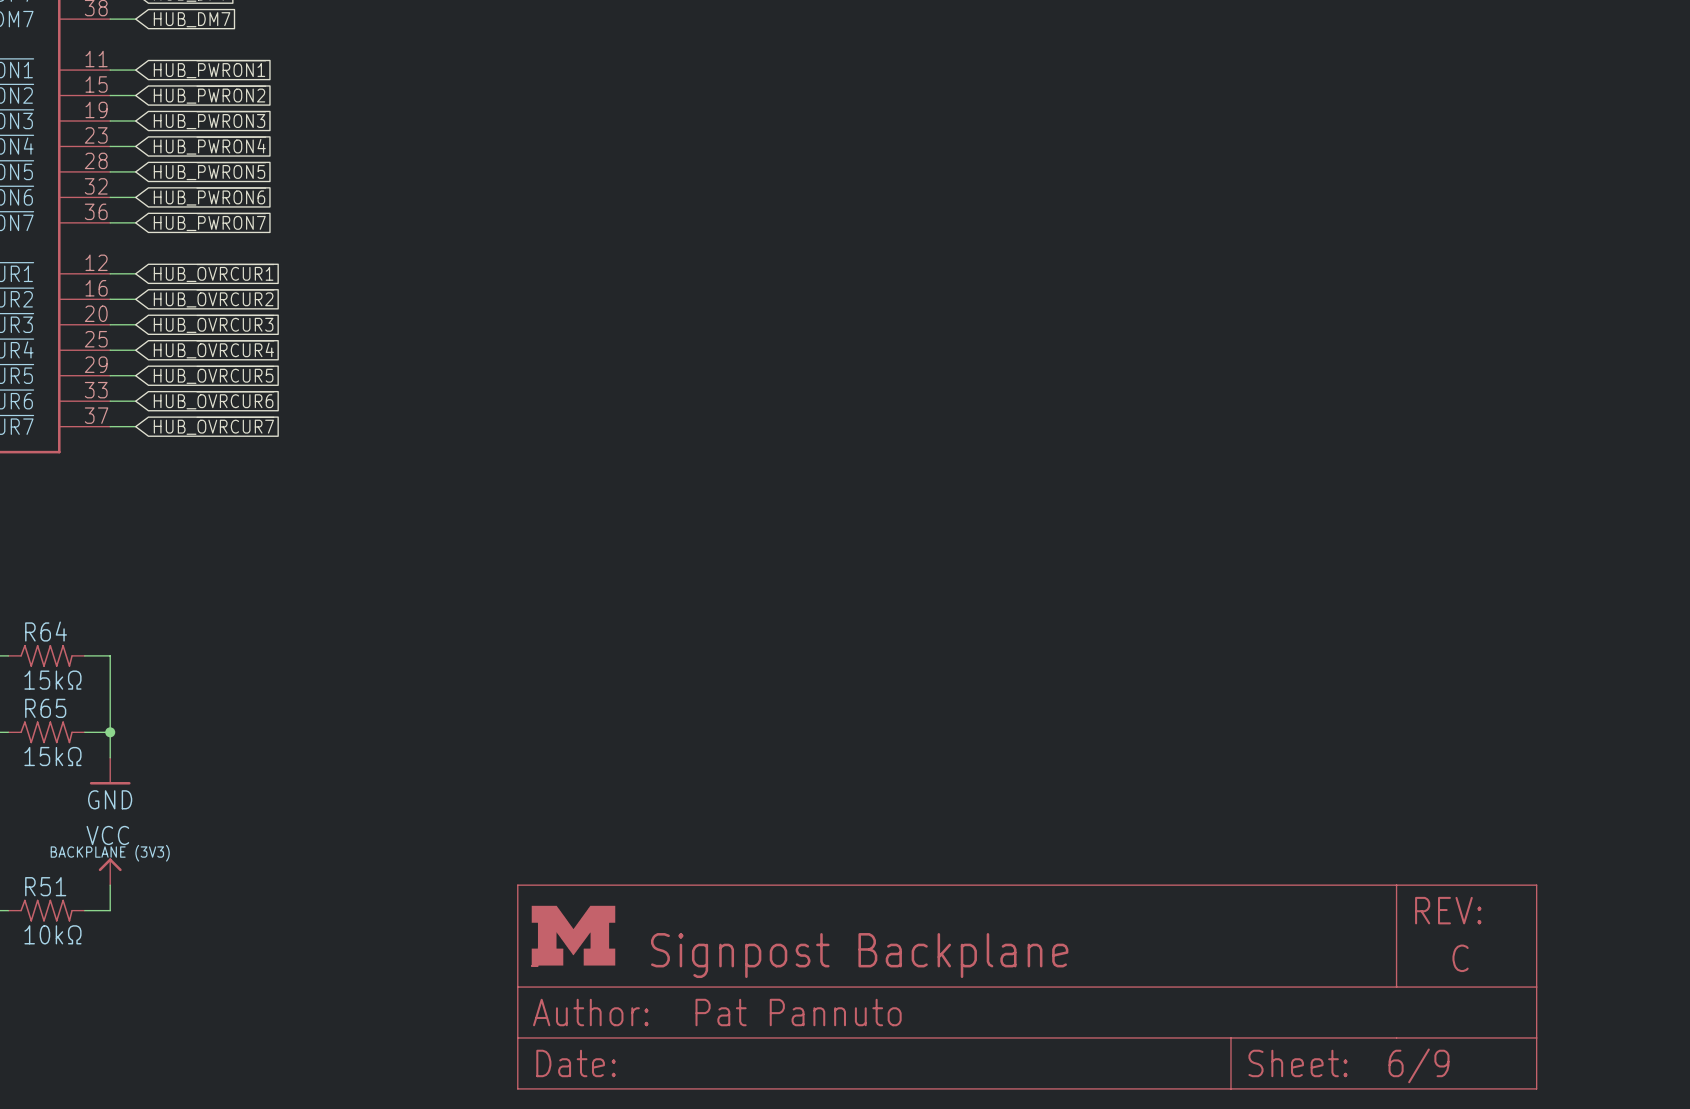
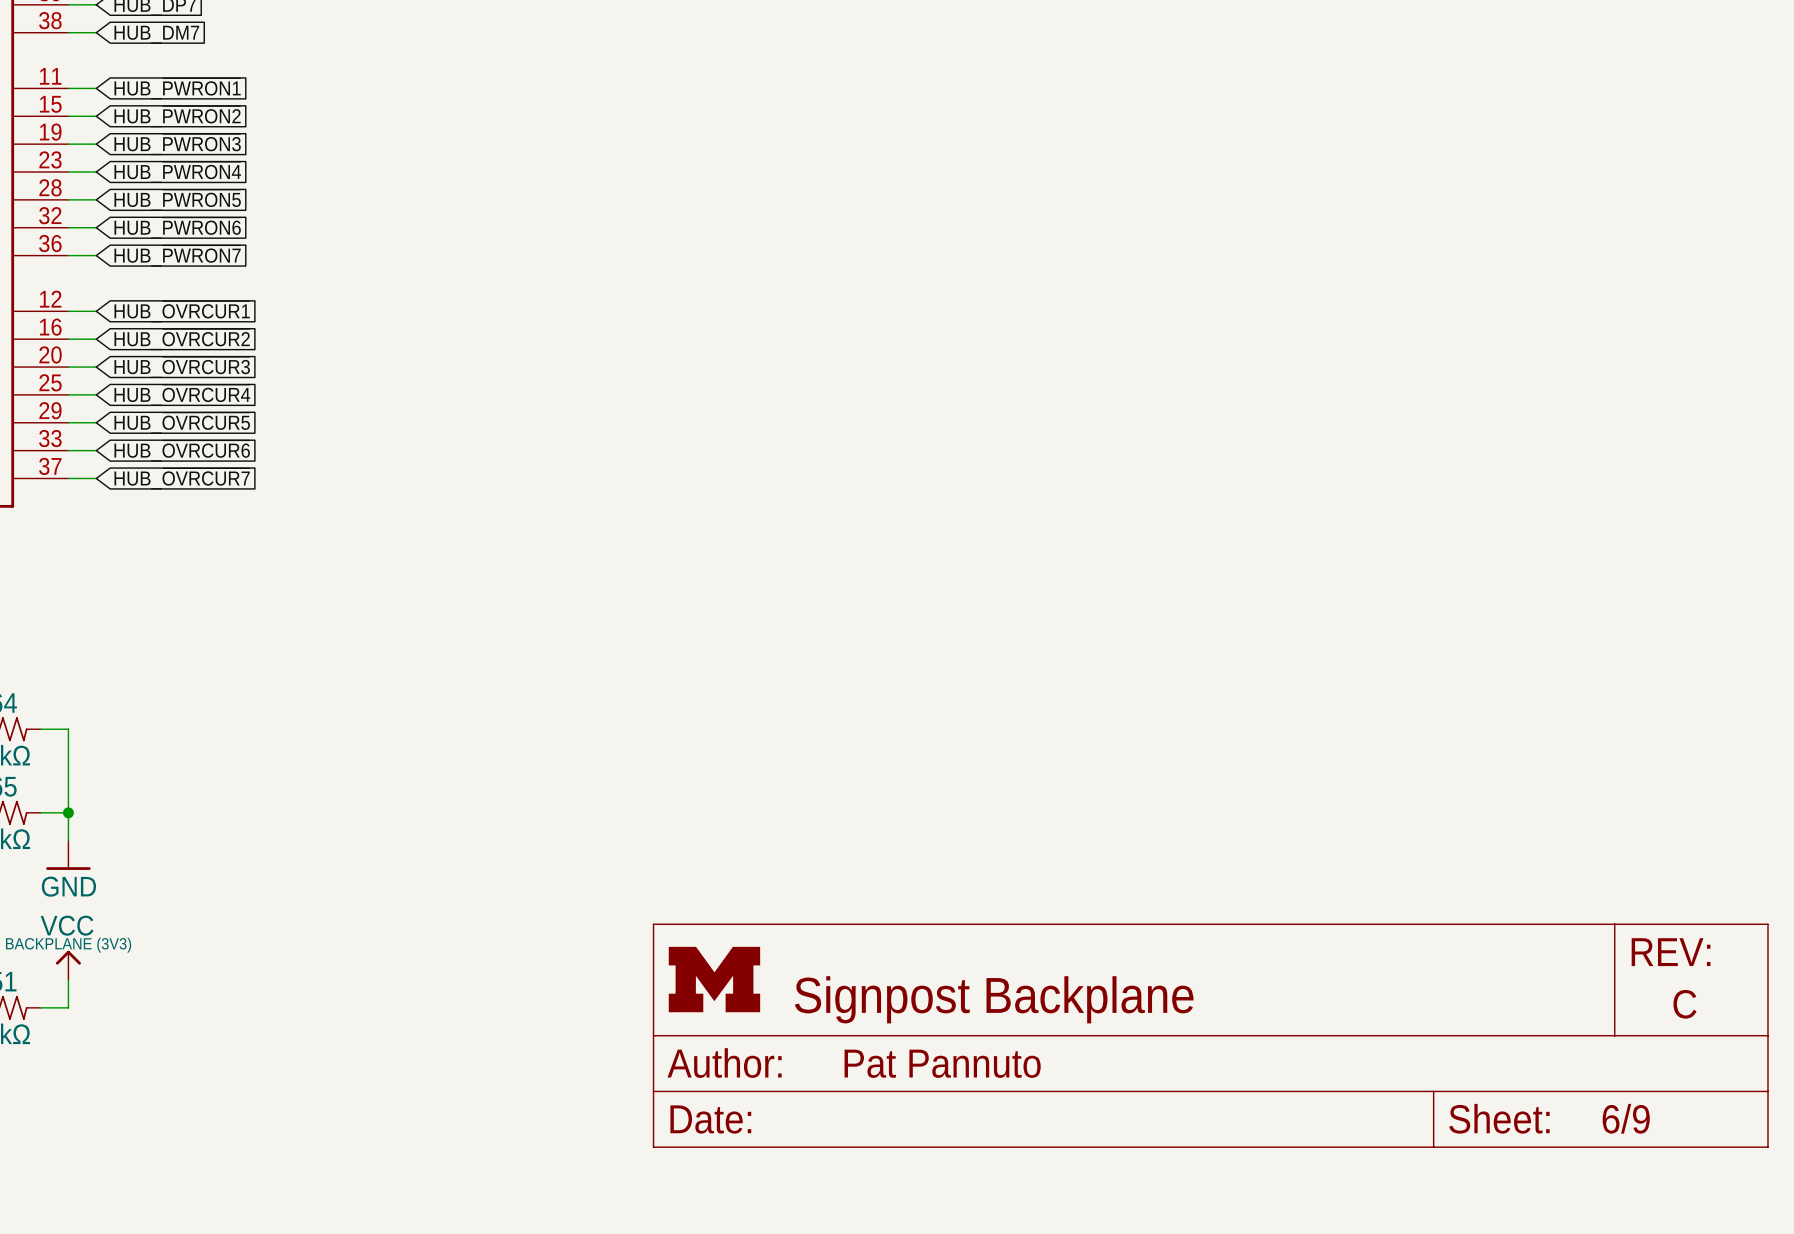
part position: (1027, 987) -> (1210, 1035)

